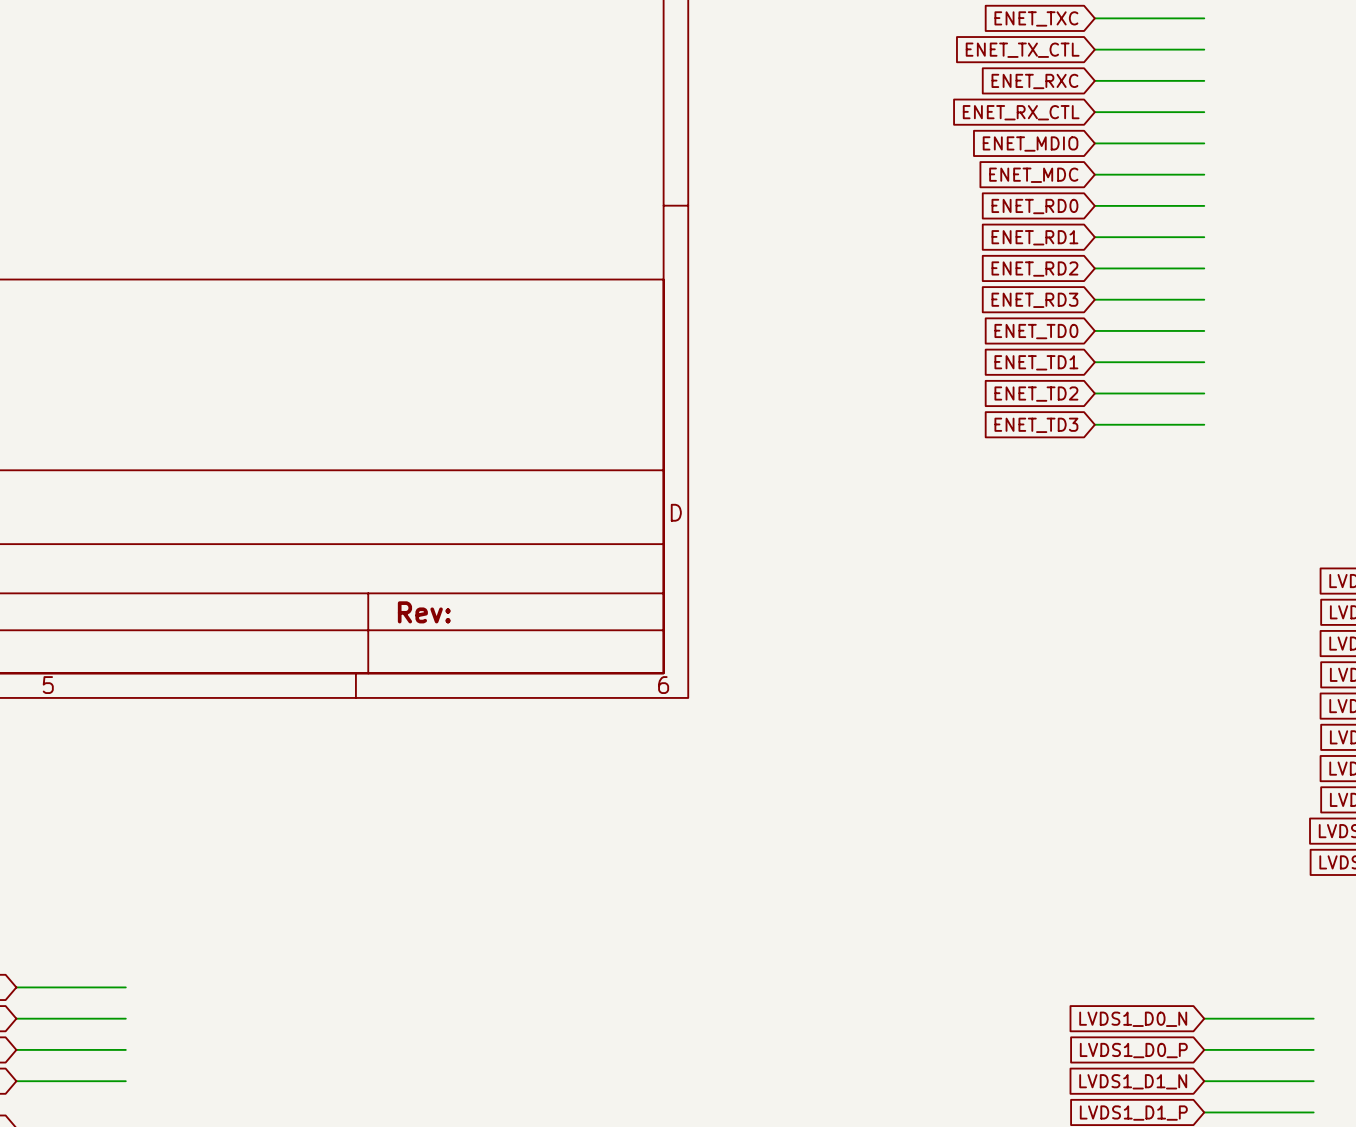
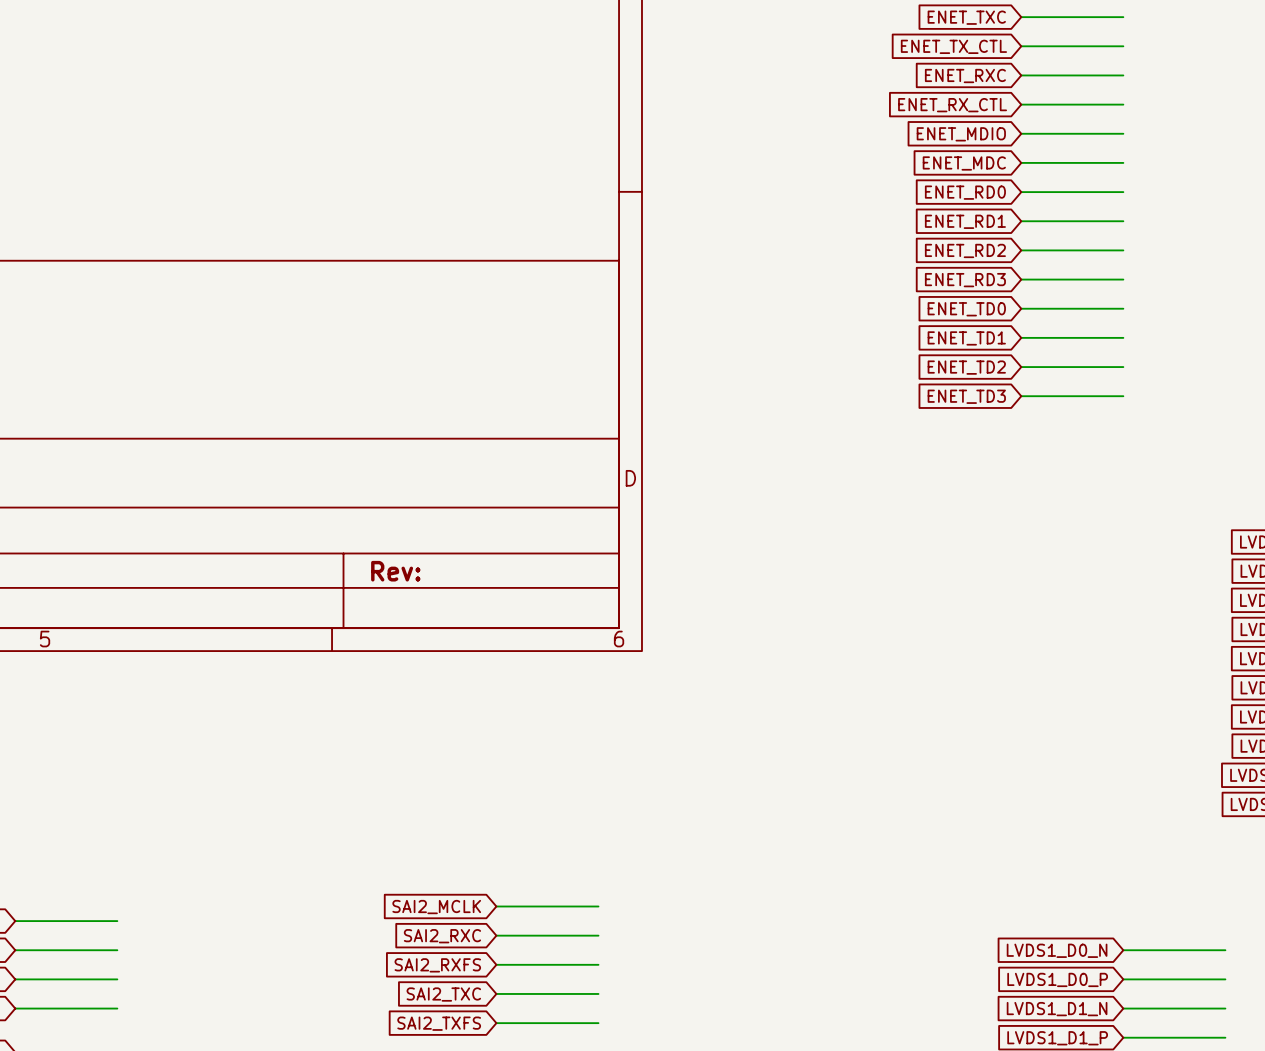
wire: none -> (496, 906) (598, 906)
global label: none -> SAI2_MCLK (436, 907)
global label: none -> SAI2_RXC (442, 936)
wire: none -> (496, 935) (598, 935)
global label: none -> SAI2_RXFS (437, 965)
wire: none -> (496, 964) (598, 964)
wire: none -> (496, 993) (598, 993)
global label: none -> SAI2_TXC (443, 994)
wire: none -> (496, 1023) (598, 1023)
global label: none -> SAI2_TXFS (439, 1023)

